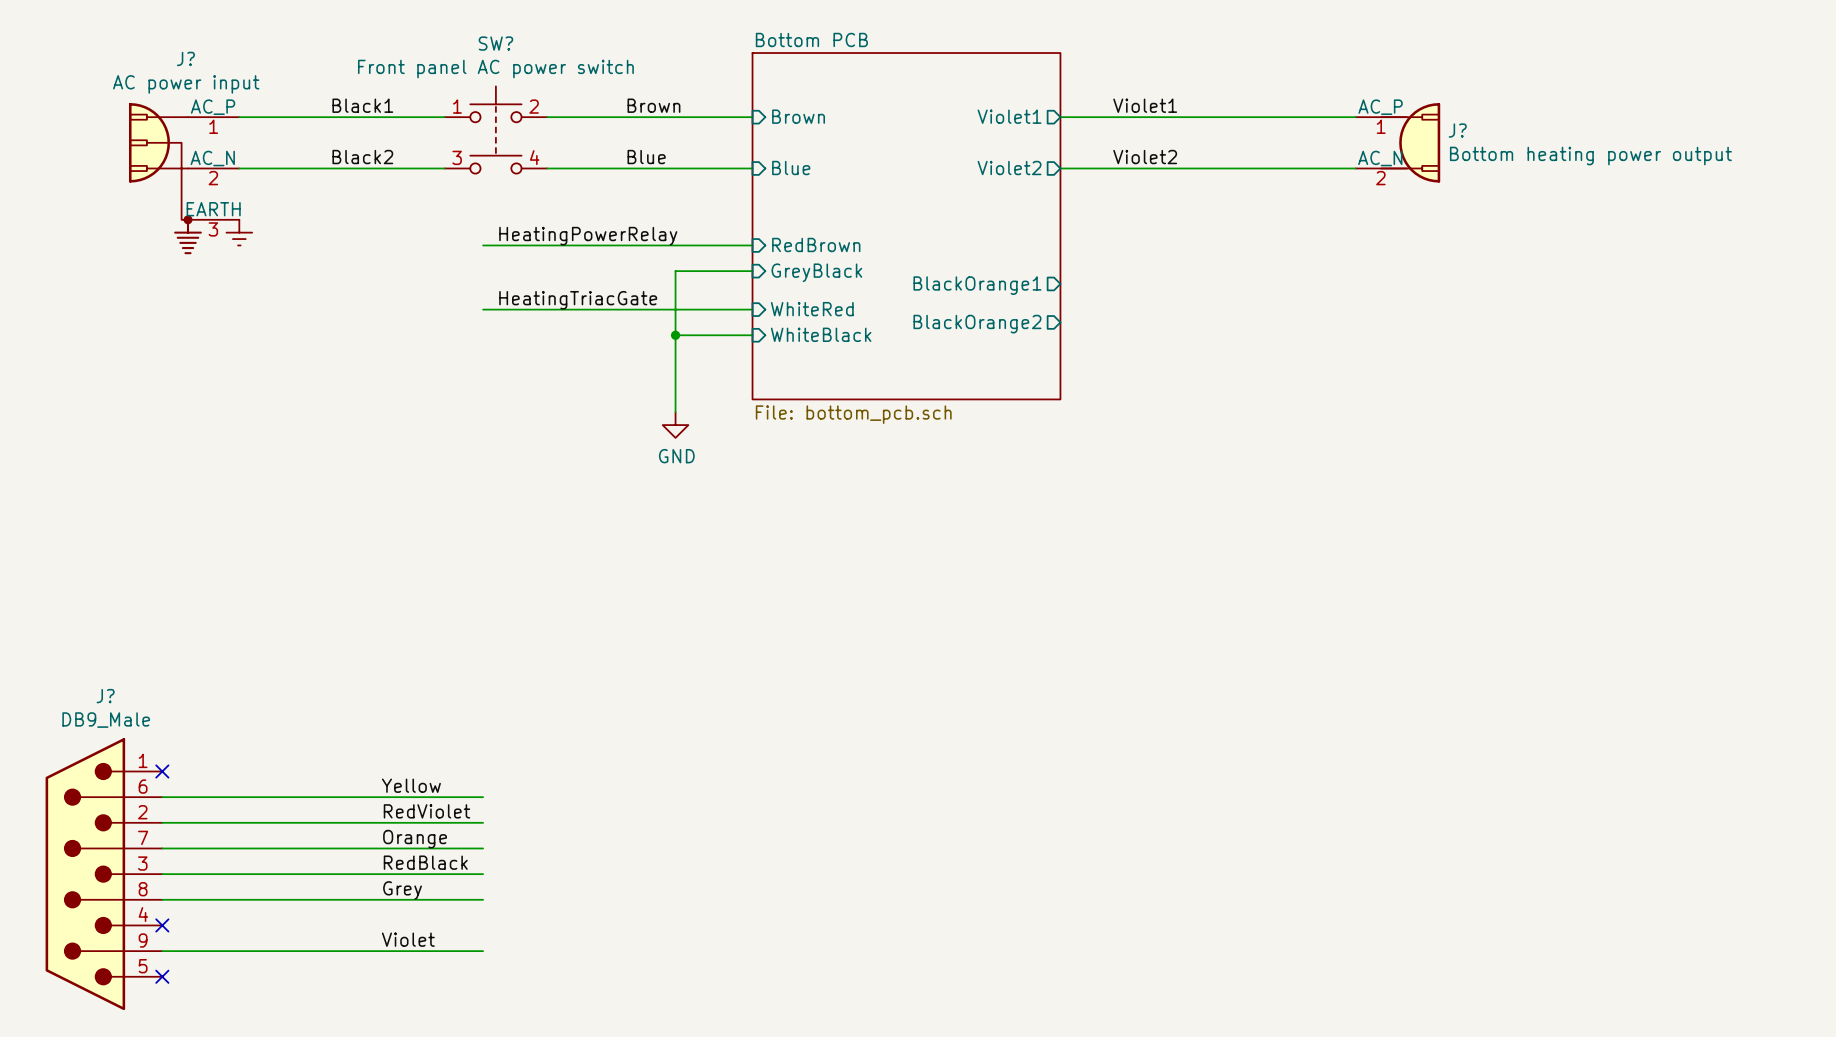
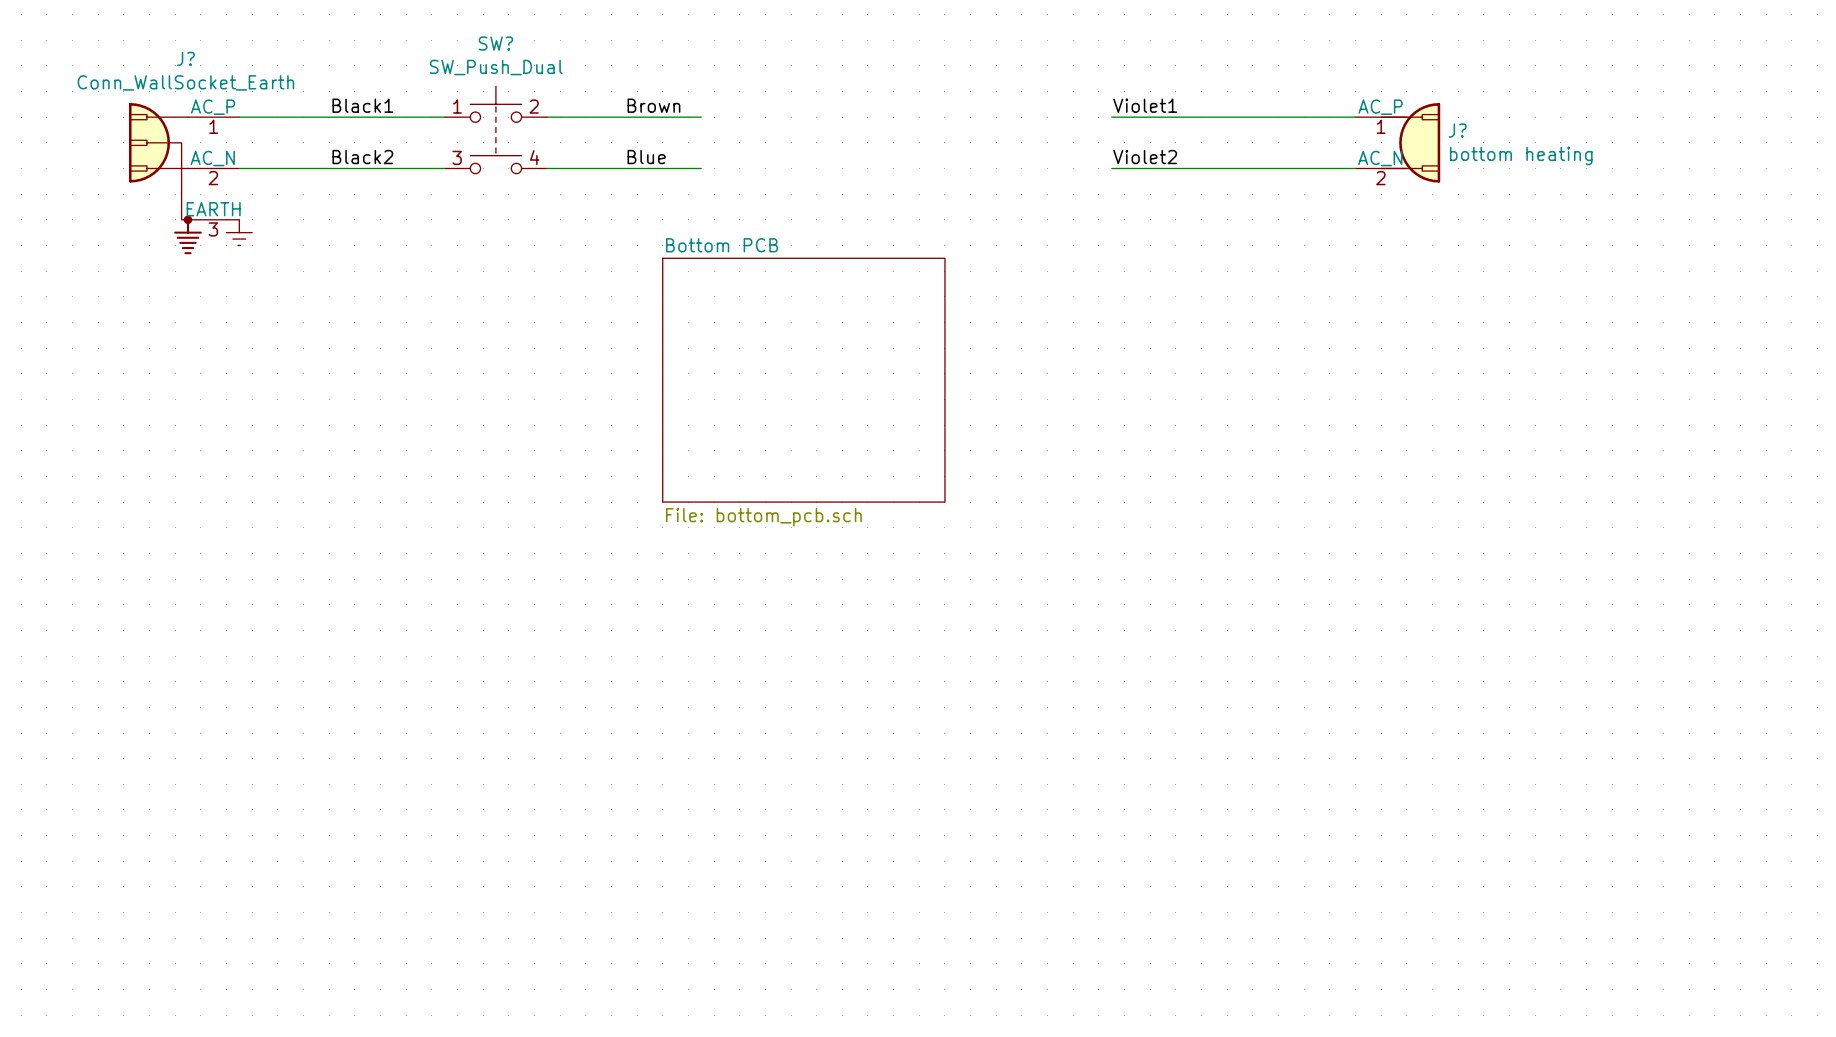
SW? value: Front panel AC power switch (495, 69) -> SW_Push_Dual (496, 67)
J? value: AC power input (186, 84) -> Conn_WallSocket_Earth (185, 82)
sheet pin: Brown (798, 116) -> none
sheet pin: Violet1 (1009, 116) -> none
wire: (701, 117) (752, 117) -> none
wire: (1060, 117) (1111, 117) -> none
J? value: Bottom heating power output (1590, 156) -> bottom heating (1521, 156)
wire: (701, 168) (752, 168) -> none
sheet pin: Blue (791, 168) -> none
sheet pin: Violet2 (1009, 168) -> none
wire: (1060, 168) (1111, 168) -> none
sheet Bottom PCB: File: bottom_pcb.sch (906, 226) -> none
label: HeatingPowerRelay (588, 236) -> none
sheet pin: RedBrown (816, 244) -> none
wire: (483, 245) (752, 245) -> none
wire: (752, 271) (675, 271) (675, 412) -> none
sheet pin: GreyBlack (816, 272) -> none
sheet pin: BlackOrange1 (977, 285) -> none
label: HeatingTriacGate (578, 300) -> none
wire: (483, 309) (752, 309) -> none
sheet pin: WhiteRed (812, 309) -> none
sheet pin: BlackOrange2 (977, 324) -> none
sheet pin: WhiteBlack (821, 334) -> none
wire: (675, 335) (752, 335) -> none
junction: (675, 335) -> none
sheet Bottom PCB: none -> File: bottom_pcb.sch (803, 380)
power symbol: GND (675, 425) -> none
no-connect mark: (162, 771) -> none
label: Yellow (411, 785) -> none
wire: (162, 797) (483, 797) -> none
label: RedViolet (426, 811) -> none
wire: (162, 822) (483, 822) -> none
label: Orange (415, 839) -> none
wire: (162, 848) (483, 848) -> none
label: RedBlack (425, 862) -> none
J?: DB9_Male (103, 874) -> none
wire: (162, 874) (483, 874) -> none
label: Grey (402, 890) -> none
wire: (162, 899) (483, 899) -> none
no-connect mark: (162, 925) -> none
label: Violet (408, 939) -> none
wire: (162, 951) (483, 951) -> none
no-connect mark: (162, 976) -> none

